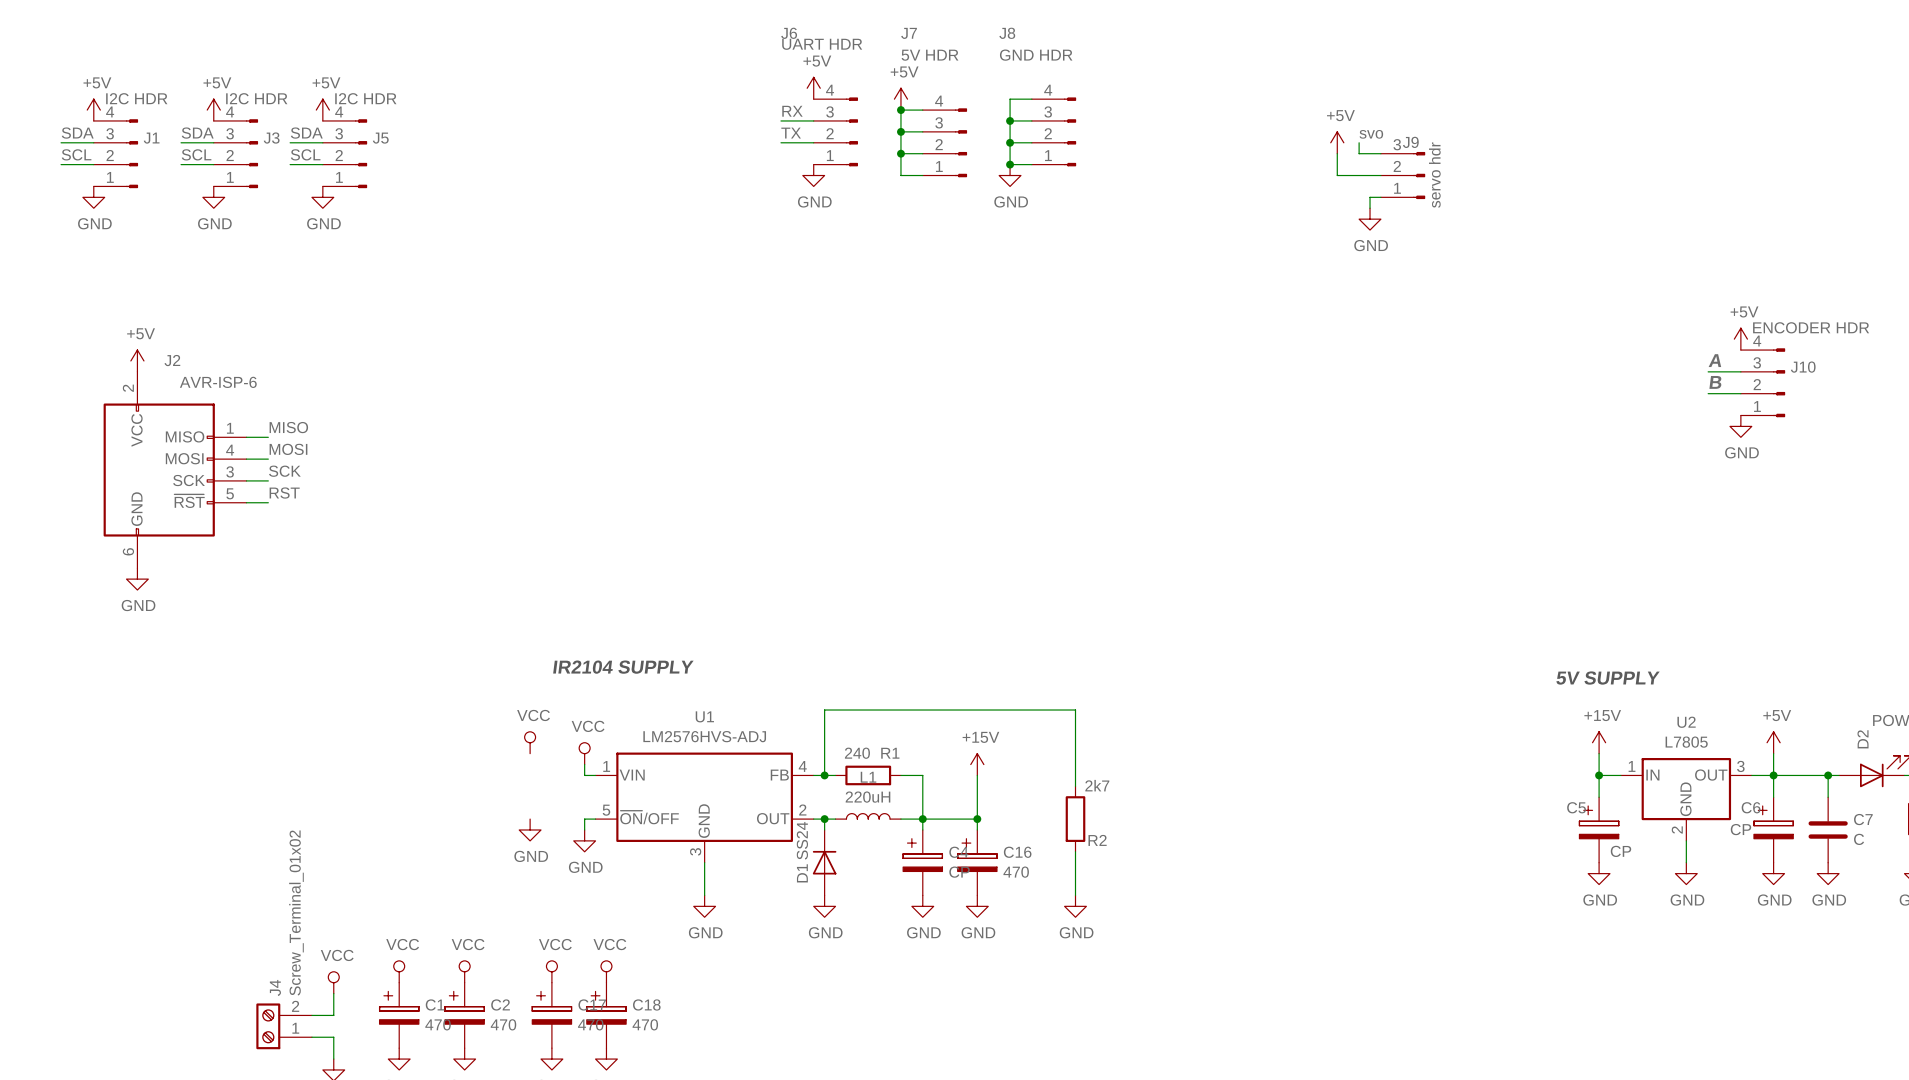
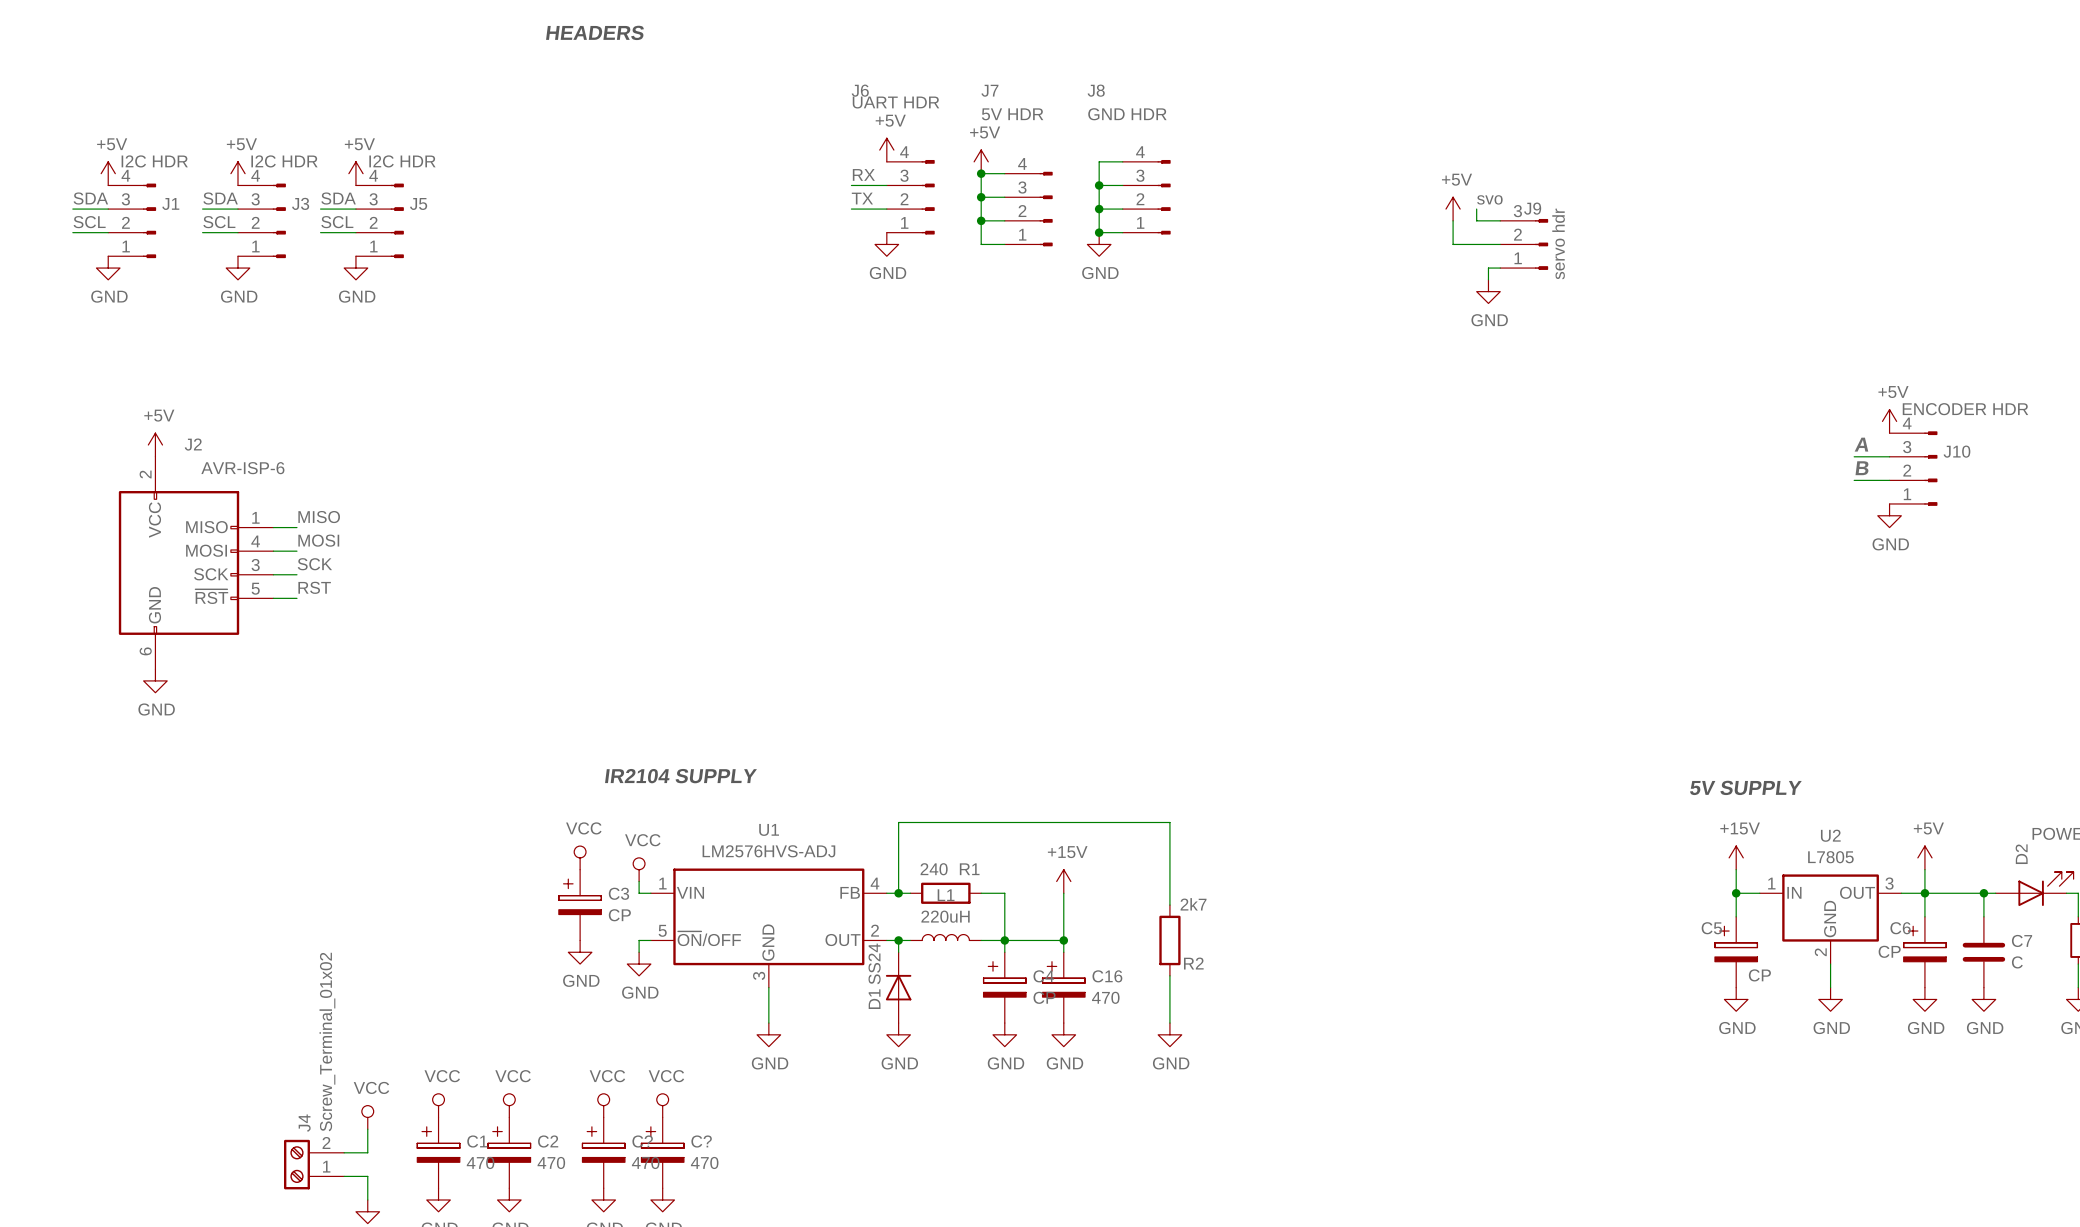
C3: none -> CP (580, 905)
C17 name: C17 (592, 1004) -> C? (642, 1141)
C18 name: C18 (646, 1004) -> C? (701, 1141)

